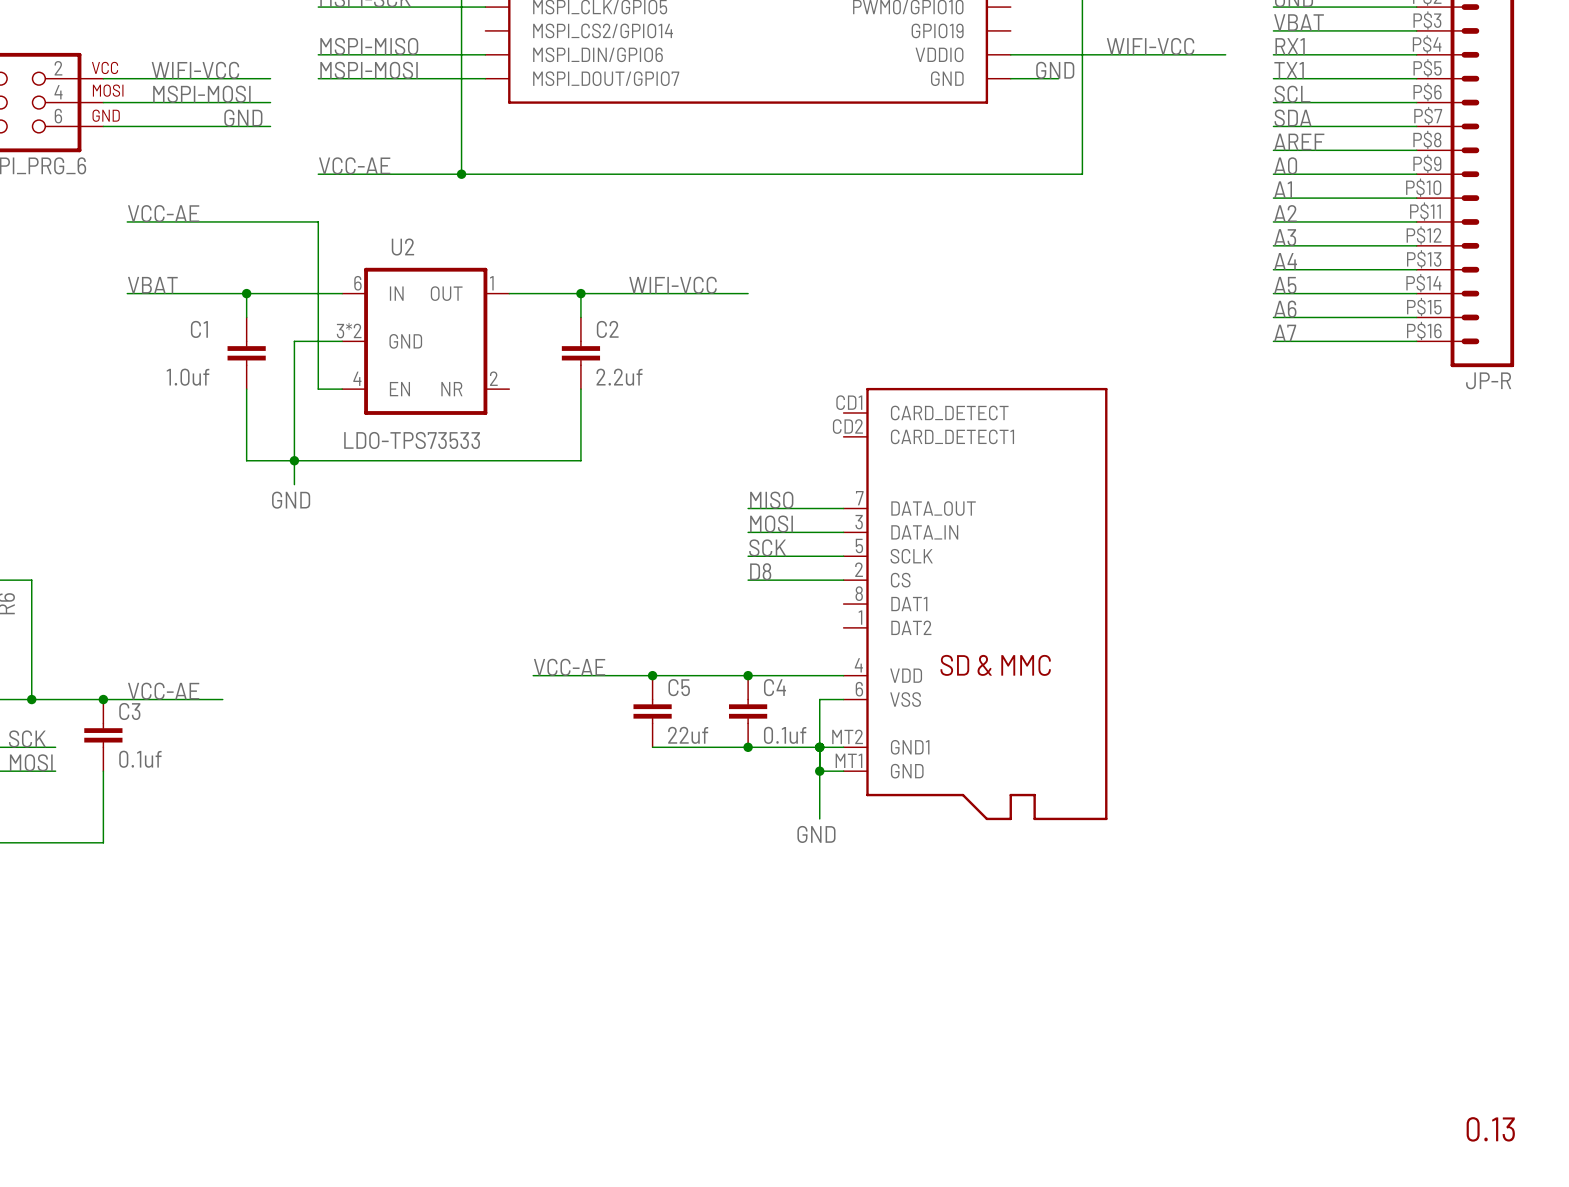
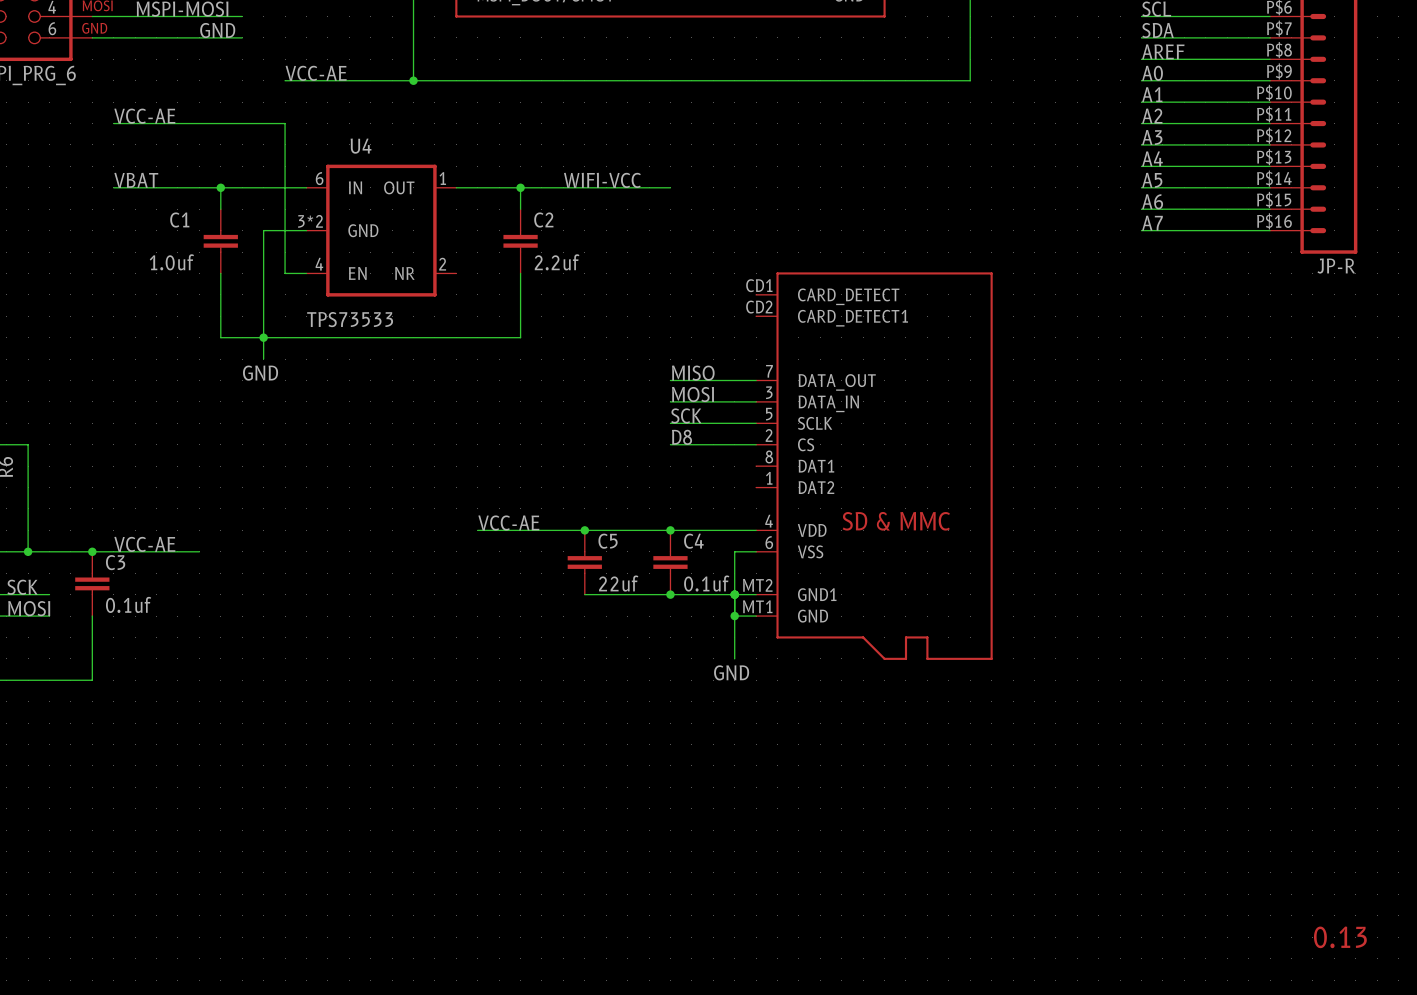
U2 name: U2 (402, 247) -> U4 (361, 146)
U2 value: LDO-TPS73533 (412, 440) -> TPS73533 (350, 319)

